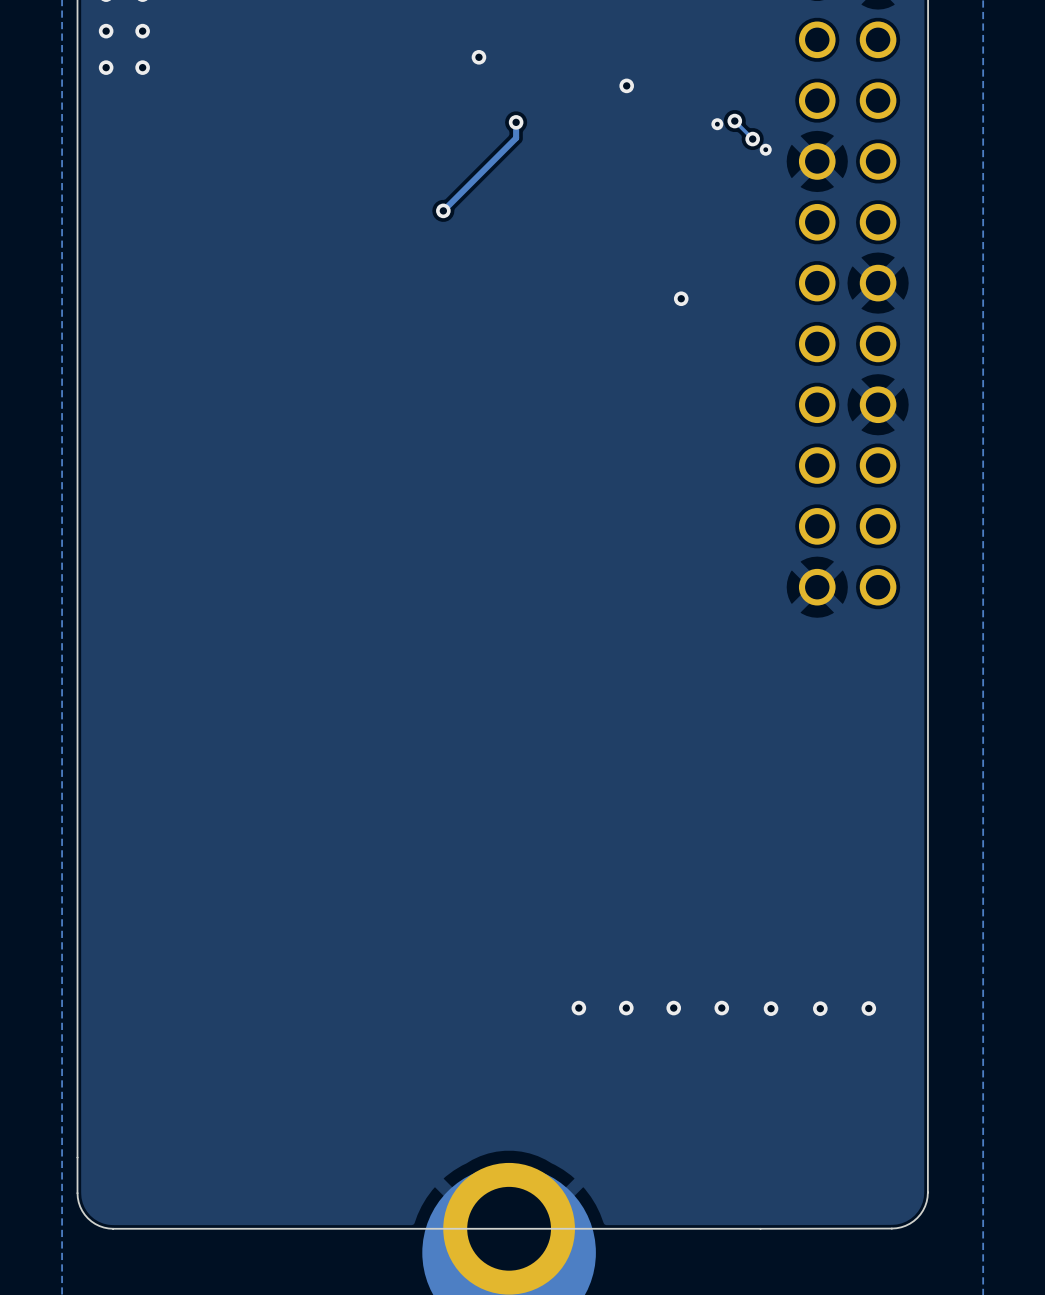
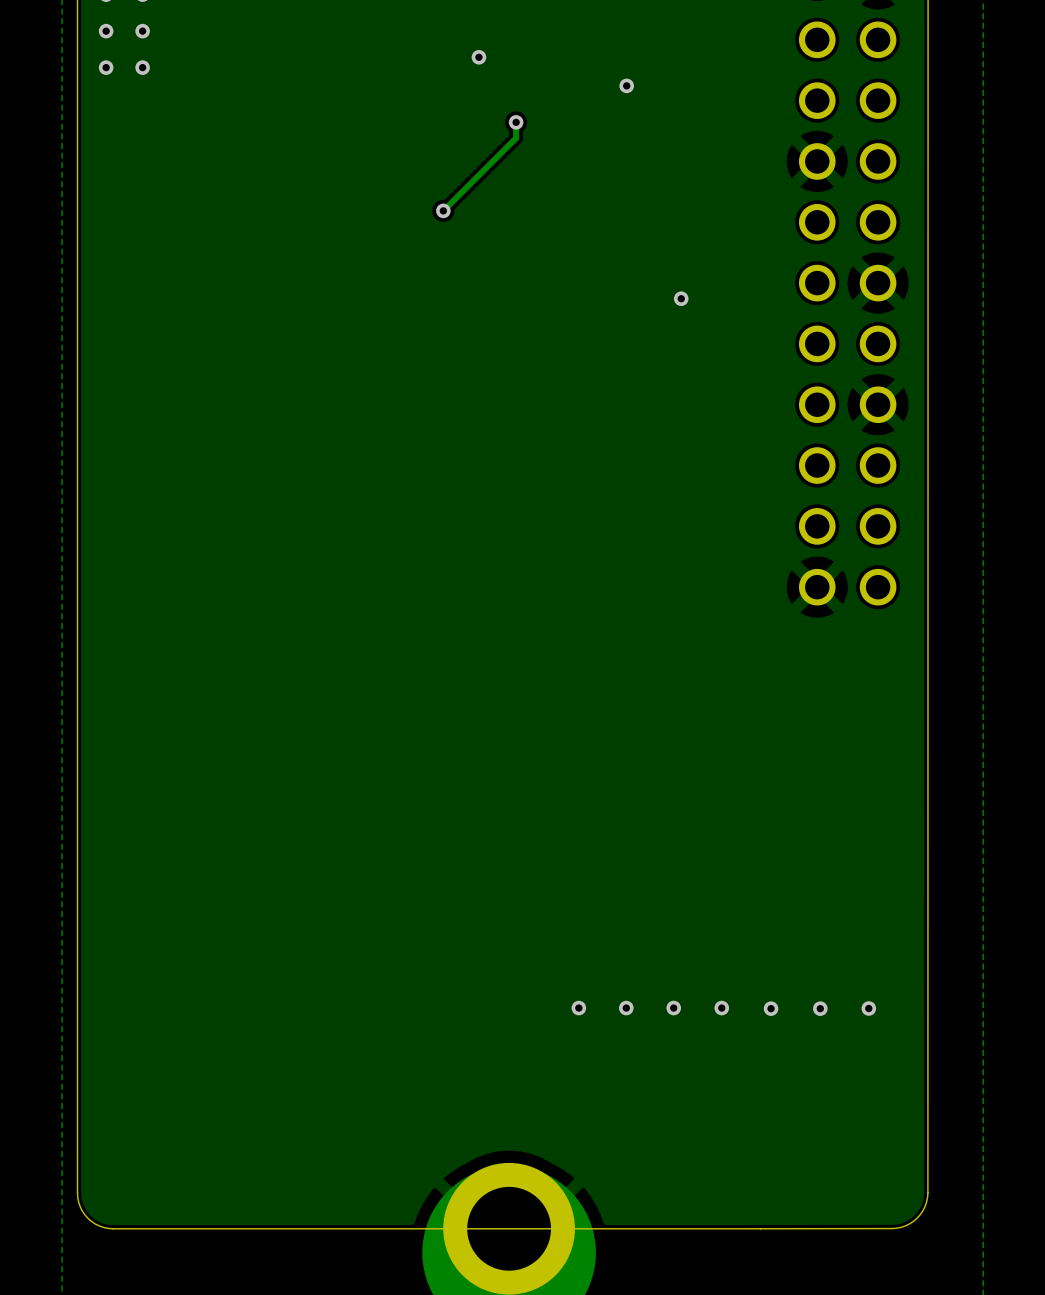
track: (734, 121) (752, 138) -> none
via: (734, 121) -> none
via: (717, 124) -> none
via: (752, 139) -> none
via: (765, 149) -> none

